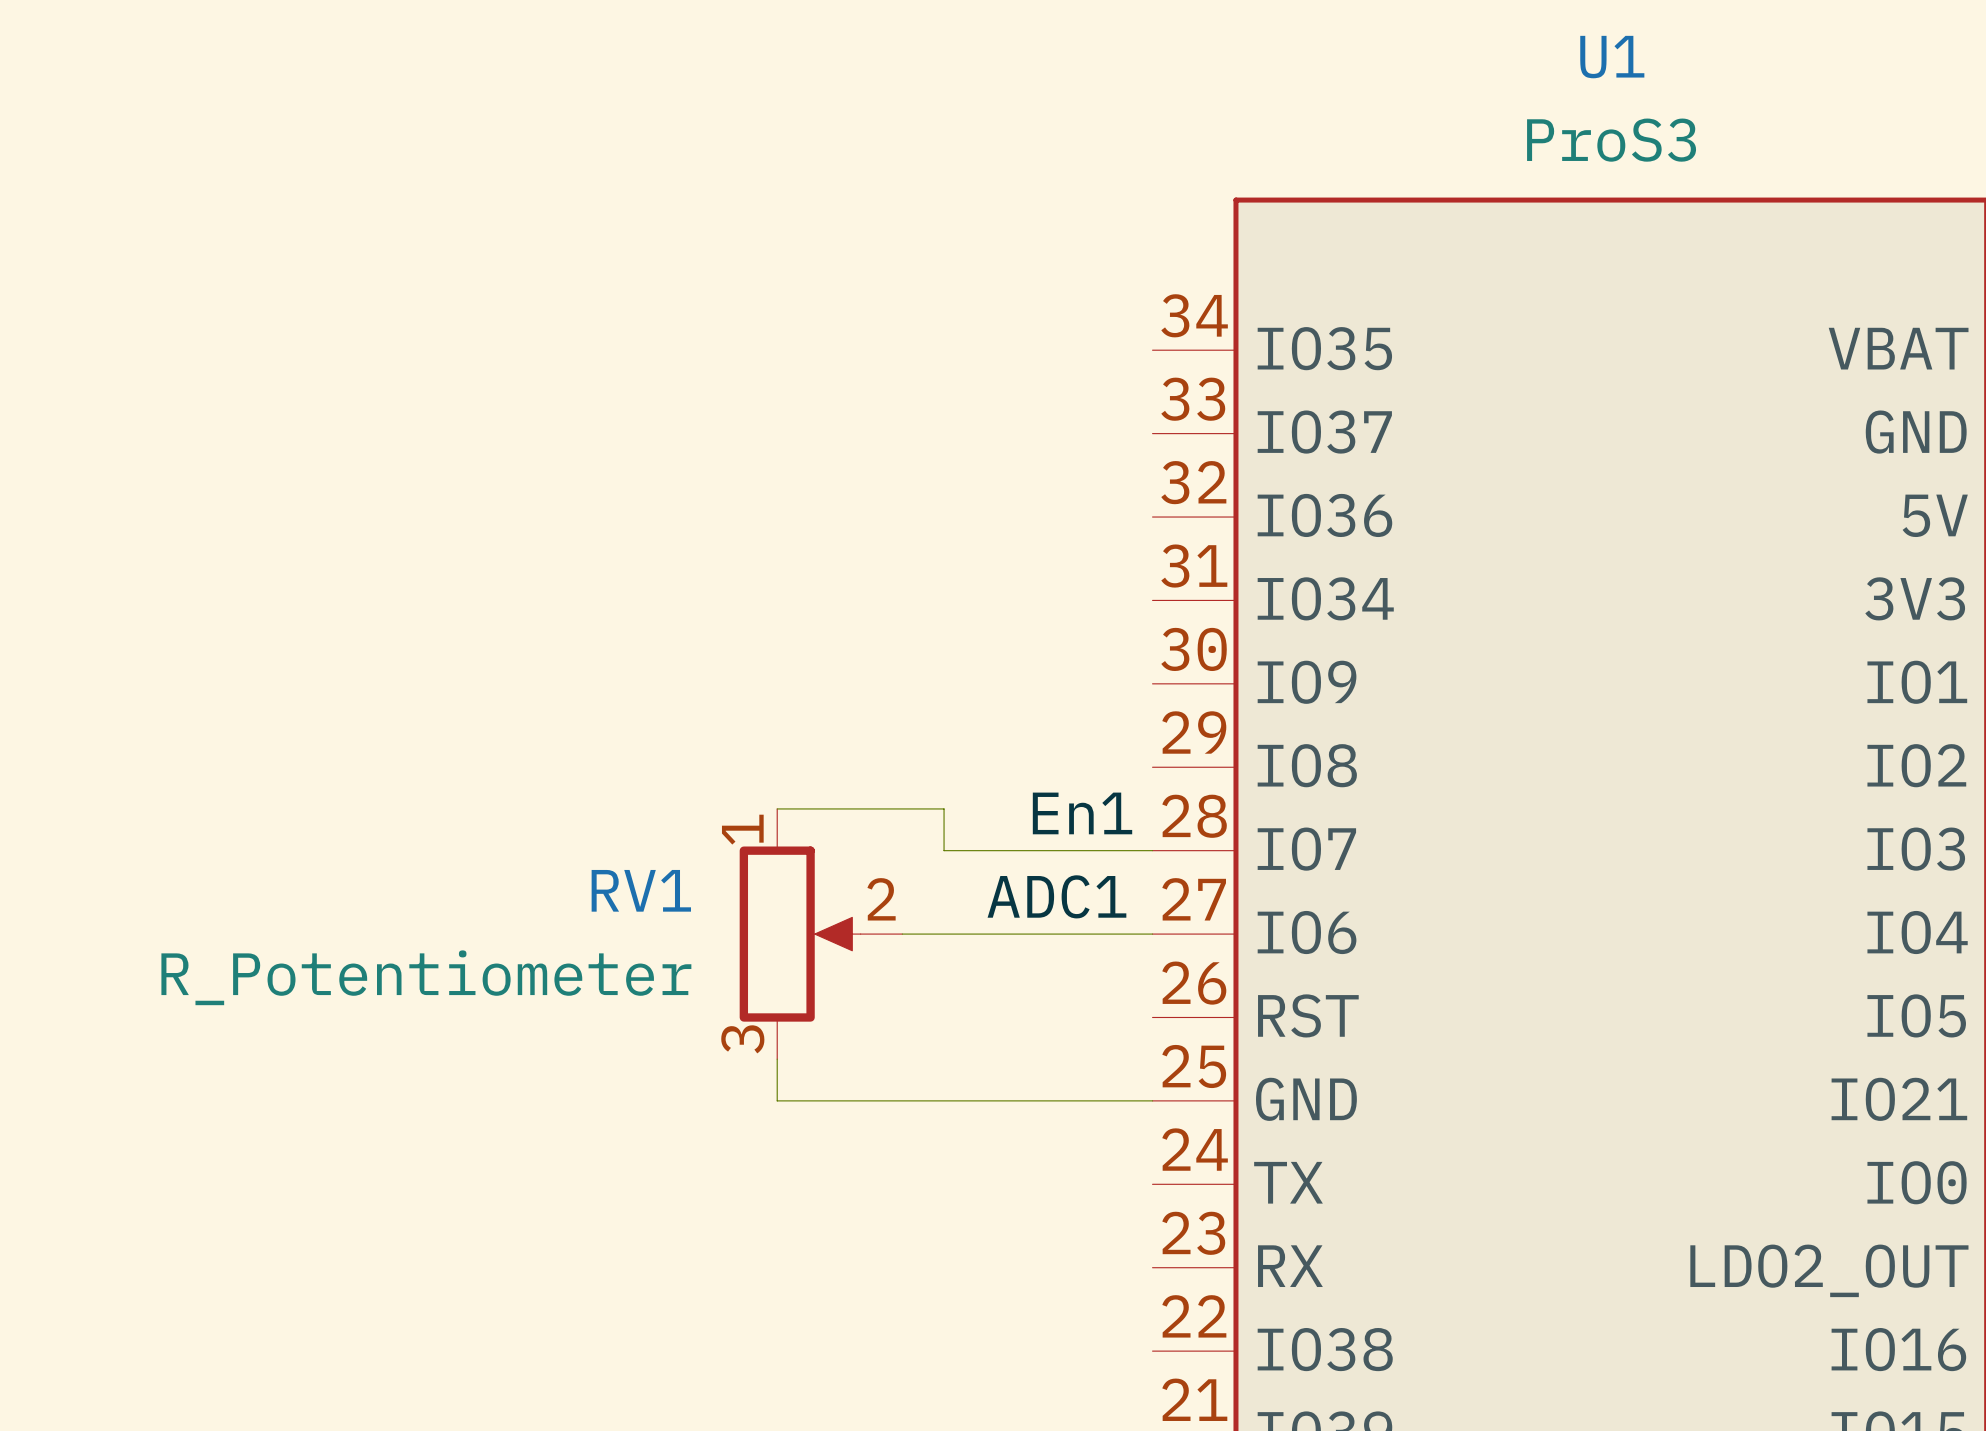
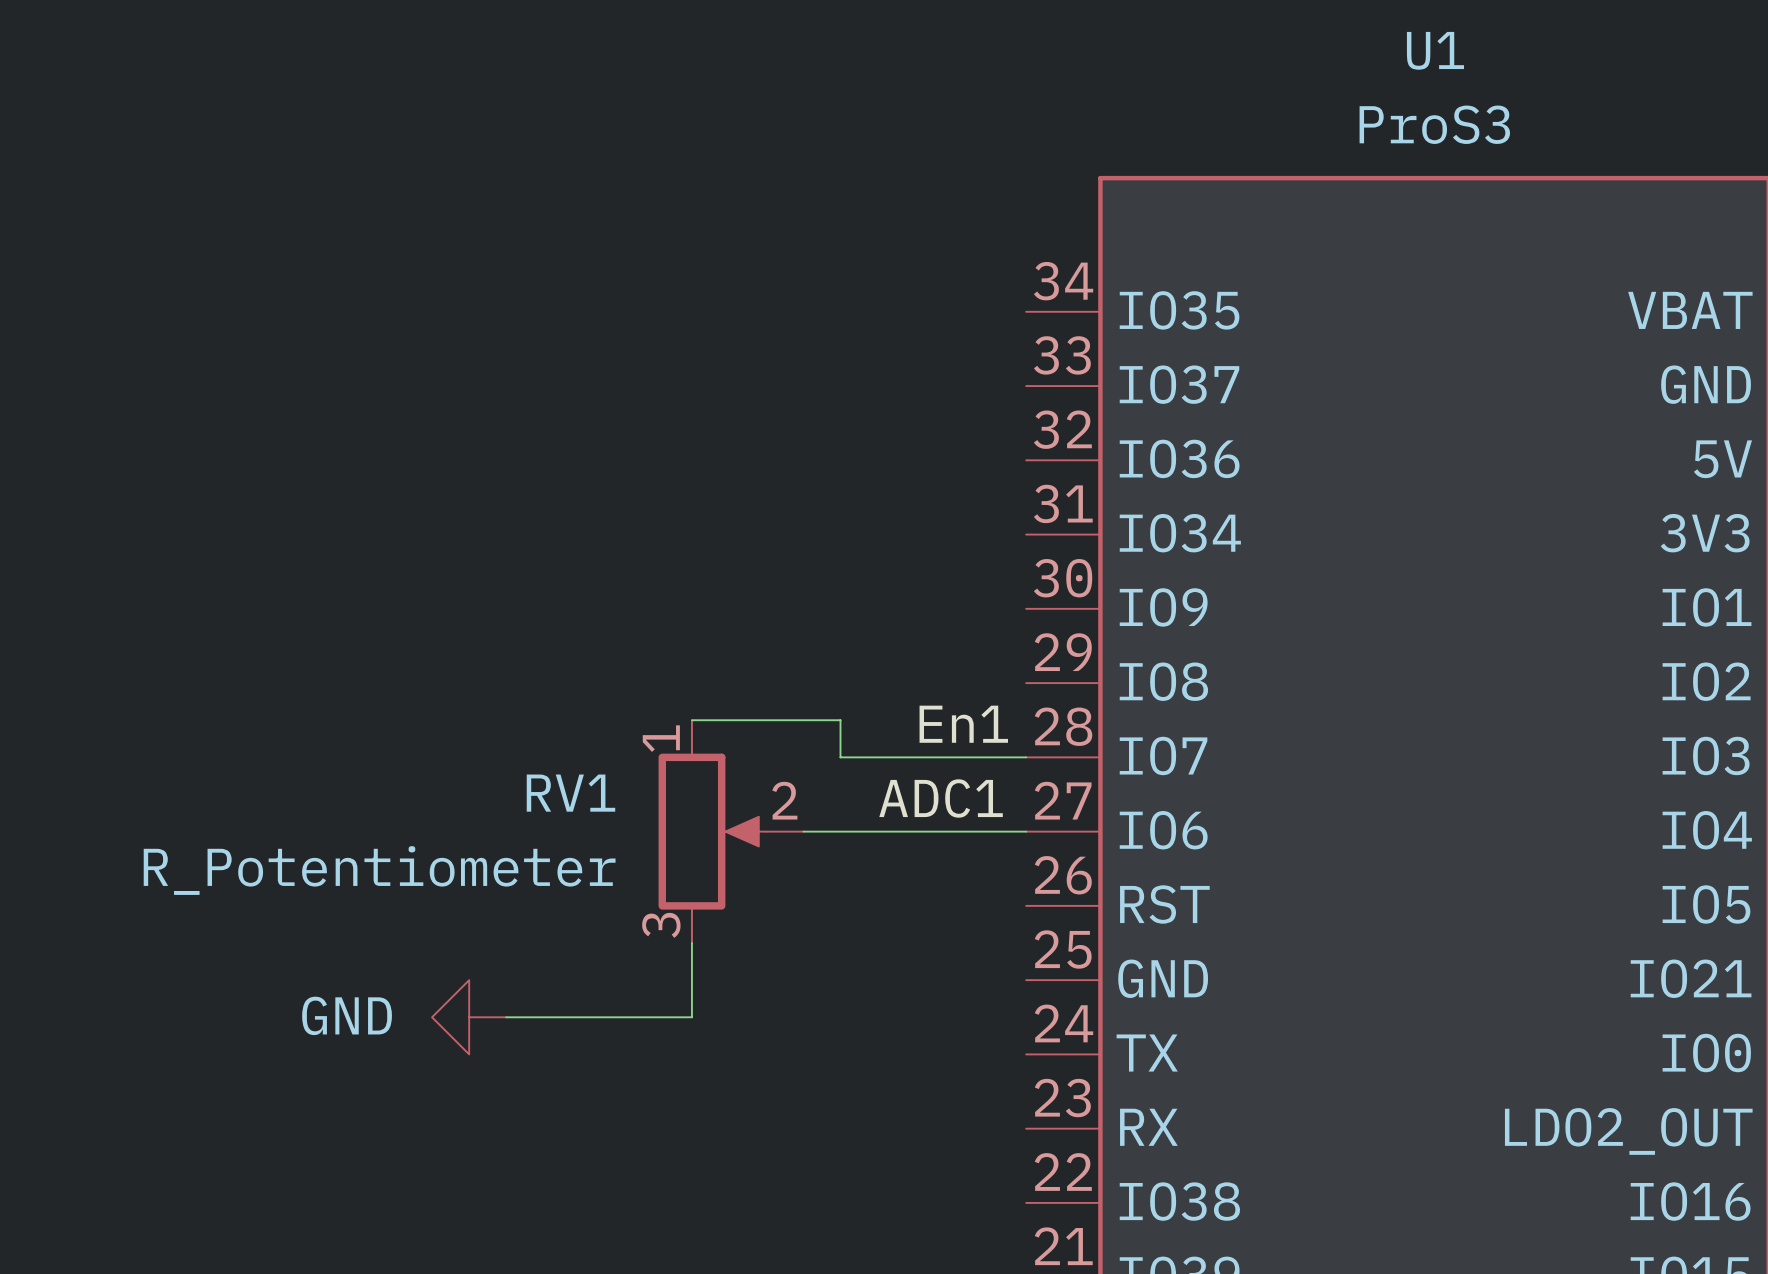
wire: (777, 1100) (1152, 1100) -> (691, 980) (691, 1017) (506, 1017)
power symbol: none -> GND (469, 1017)

